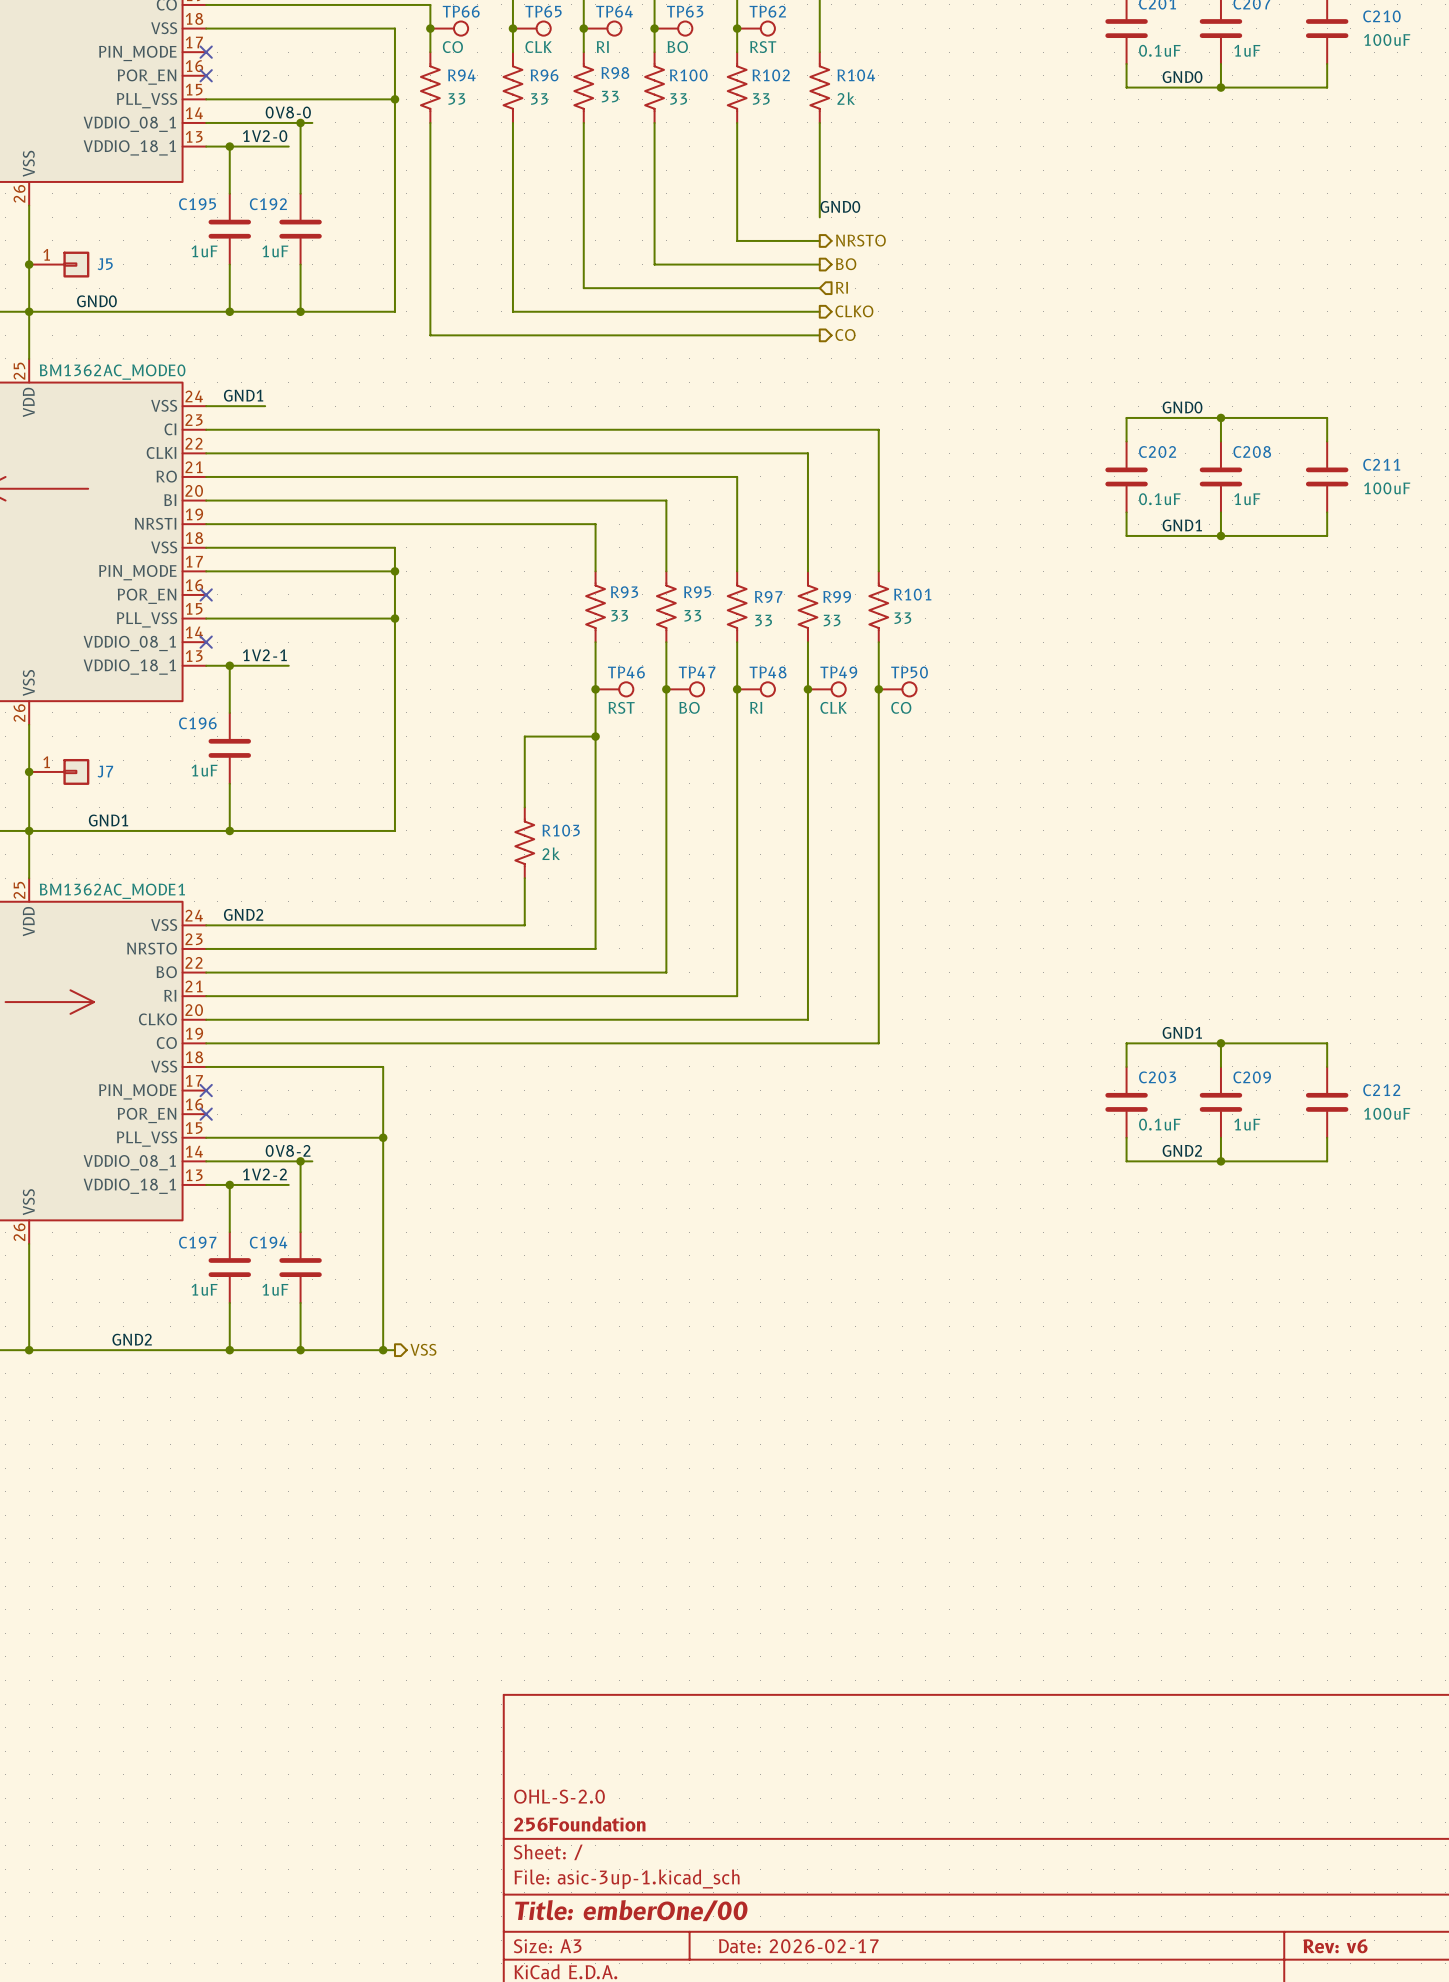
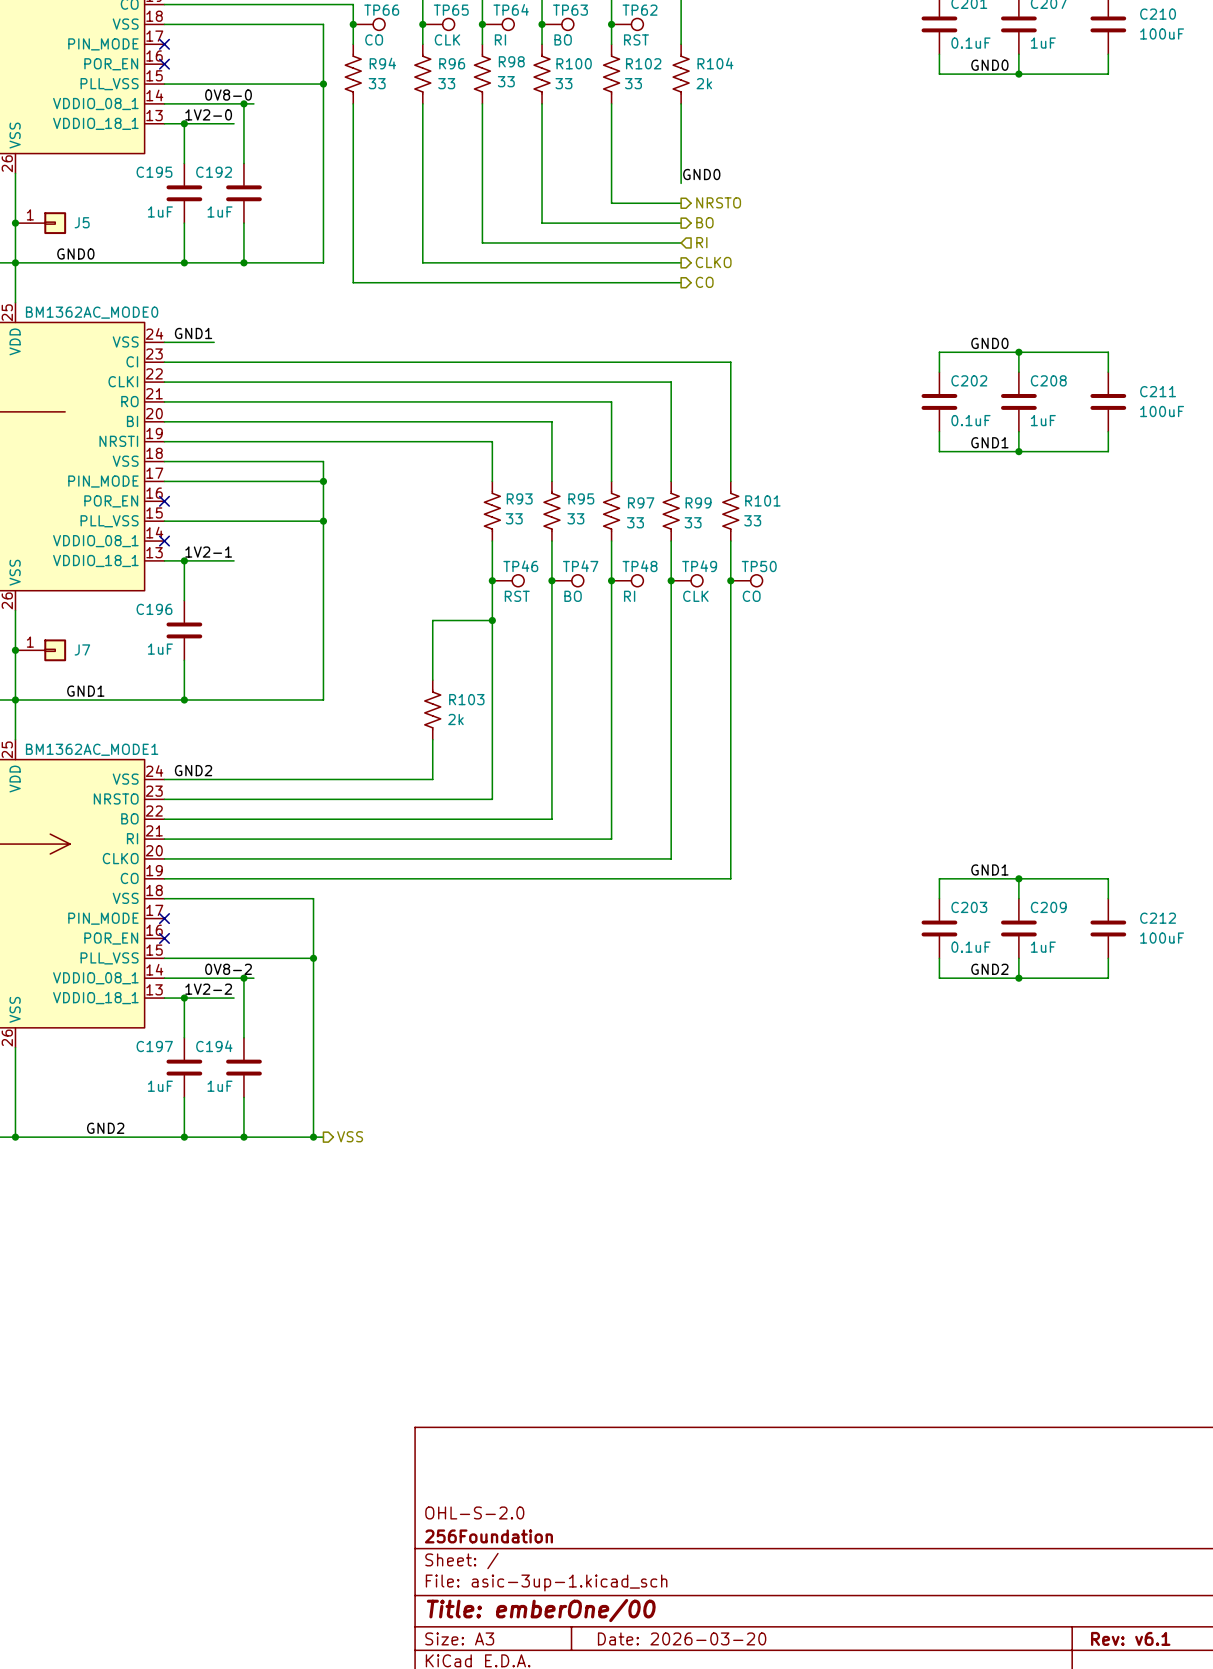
title block: Date: 2026-02-17 (798, 1946) -> Date: 2026-03-20 (682, 1638)
title block: Rev: v6 (1335, 1946) -> Rev: v6.1 (1130, 1638)

